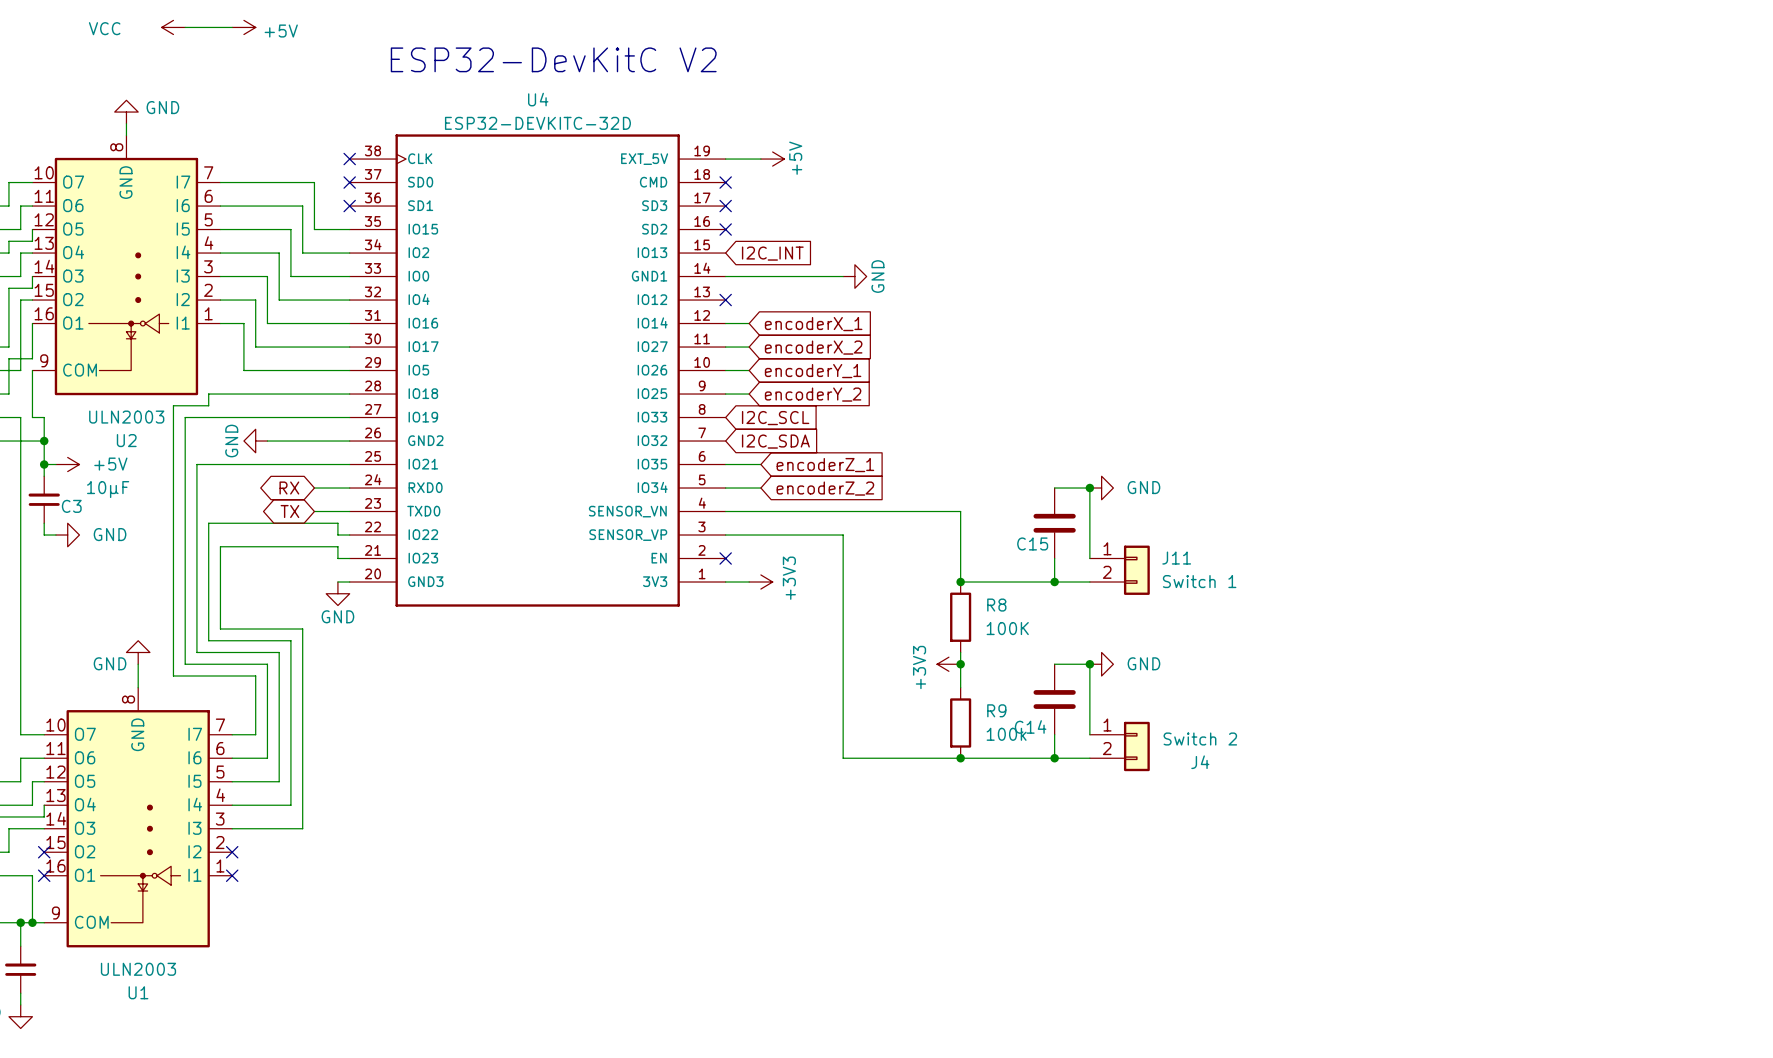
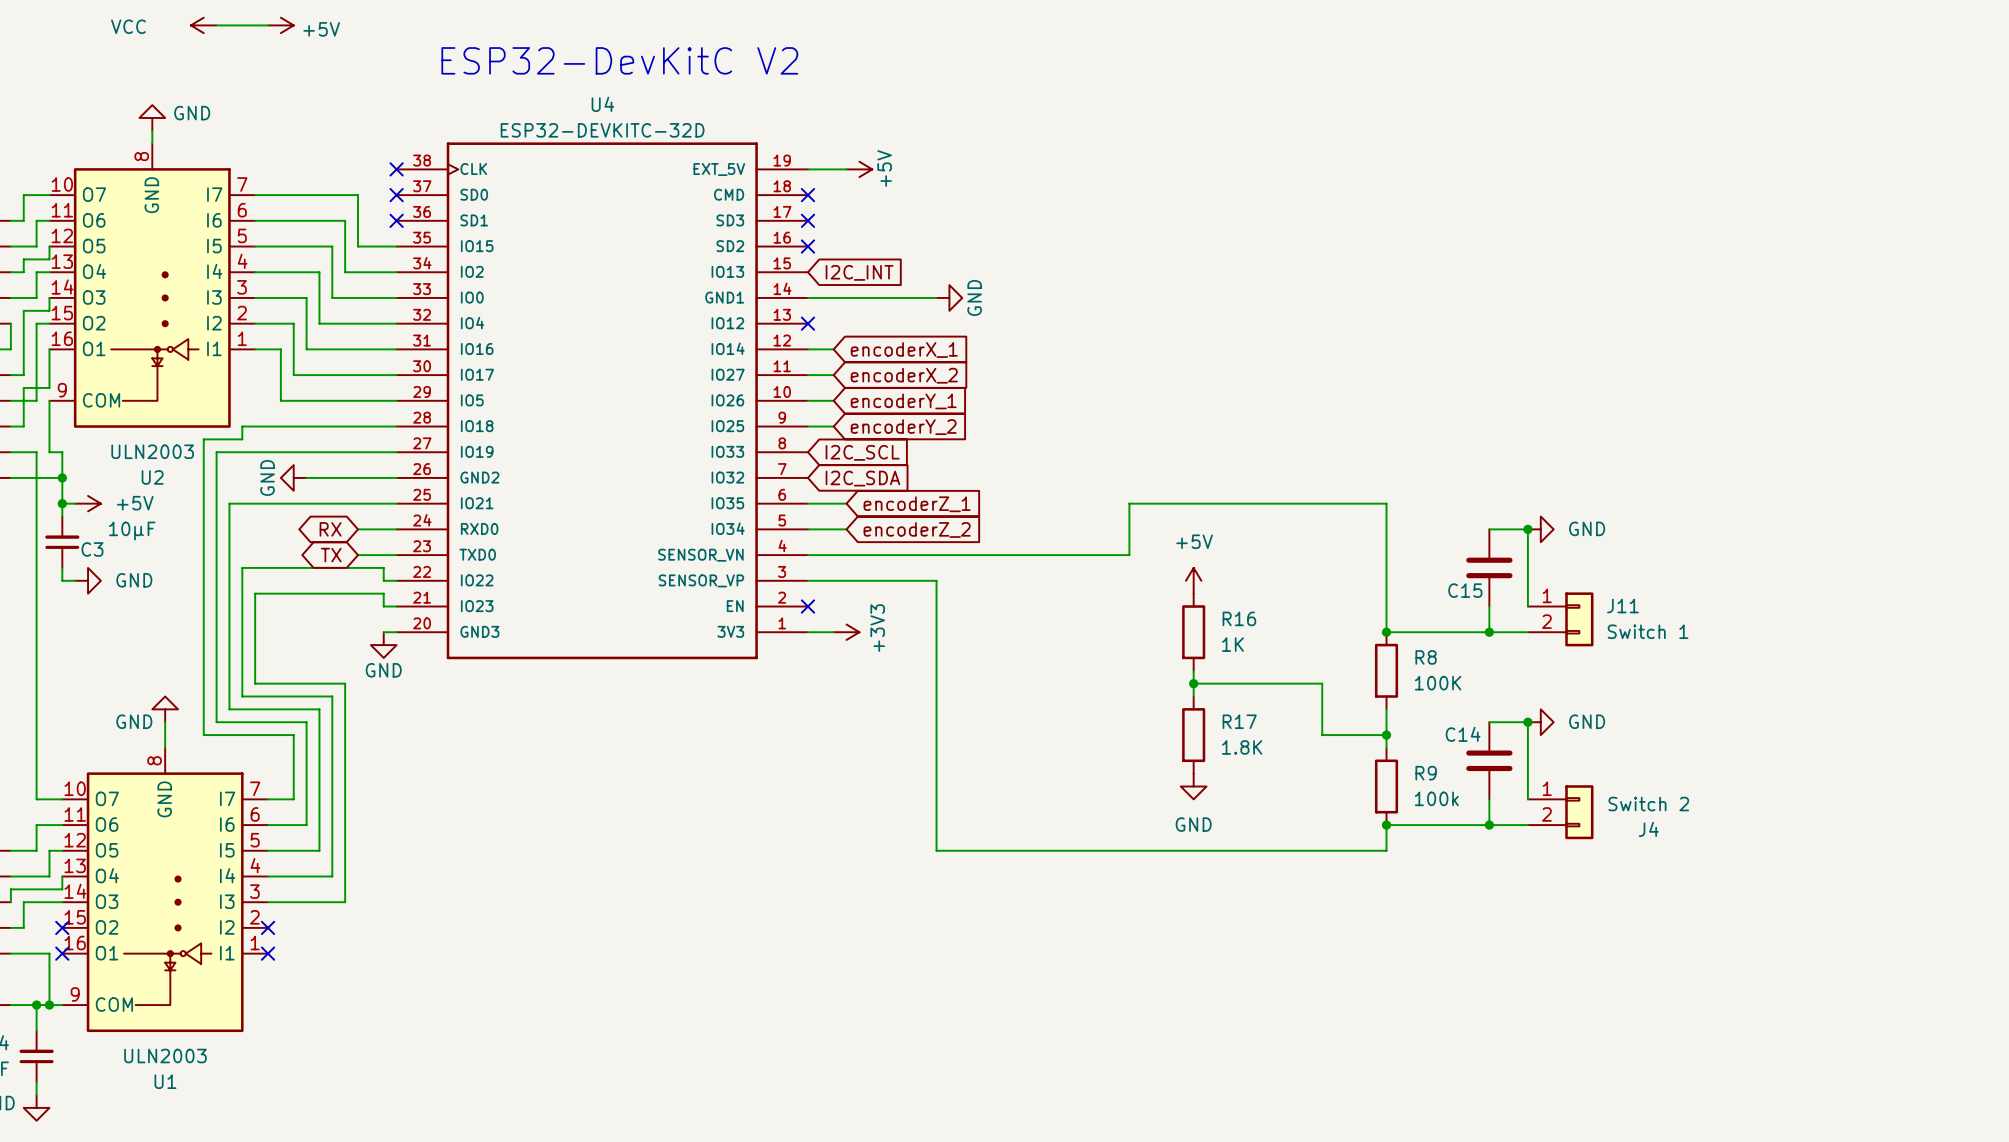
wire: (1054, 488) (1089, 488) (1089, 558) -> none
junction: (1089, 488) -> none
power symbol: GND (1101, 488) -> none
wire: none -> (1489, 529) (1527, 529) (1527, 606)
junction: none -> (1527, 529)
power symbol: none -> GND (1540, 529)
wire: (960, 511) (960, 582) (1089, 582) -> (1065, 555) (1129, 555) (1129, 503) (1386, 503) (1386, 632) (1527, 632)
C15 position: (1054, 523) -> (1489, 567)
power symbol: none -> +5V (1193, 580)
wire: (1054, 558) (1054, 582) -> (1193, 670) (1193, 696)
wire: none -> (1489, 606) (1489, 632)
J11 position: (1119, 570) -> (1560, 619)
junction: (960, 582) -> none
junction: (1054, 582) -> none
R16: none -> 1K (1193, 632)
junction: none -> (1386, 632)
junction: none -> (1489, 632)
R8 position: (960, 617) -> (1386, 670)
wire: none -> (1193, 683) (1322, 683) (1322, 735) (1386, 735)
junction: none -> (1193, 683)
wire: (960, 652) (960, 687) -> none
wire: none -> (1386, 709) (1386, 747)
power symbol: +3V3 (948, 664) -> none
junction: (960, 664) -> none
wire: (1054, 664) (1089, 664) (1089, 734) -> none
junction: (1089, 664) -> none
power symbol rotation: 0° (1101, 664) -> 90° clockwise (1193, 786)
power symbol position: GND (1101, 664) -> GND (1193, 786)
wire: none -> (1489, 722) (1527, 722) (1527, 799)
junction: none -> (1527, 722)
power symbol: none -> GND (1540, 722)
R17: none -> 1.8K (1193, 735)
junction: none -> (1386, 735)
C14 position: (1054, 699) -> (1489, 760)
R9 position: (960, 722) -> (1386, 786)
C14 name position: C14 (1030, 726) -> C14 (1463, 734)
wire: (1054, 734) (1054, 758) -> none
wire: none -> (1489, 799) (1489, 825)
J4 position: (1119, 746) -> (1560, 812)
wire: (843, 758) (1089, 758) -> (936, 825) (936, 850) (1386, 850) (1386, 825) (1527, 825)
junction: (960, 758) -> none
junction: (1054, 758) -> none
junction: none -> (1386, 825)
junction: none -> (1489, 825)

